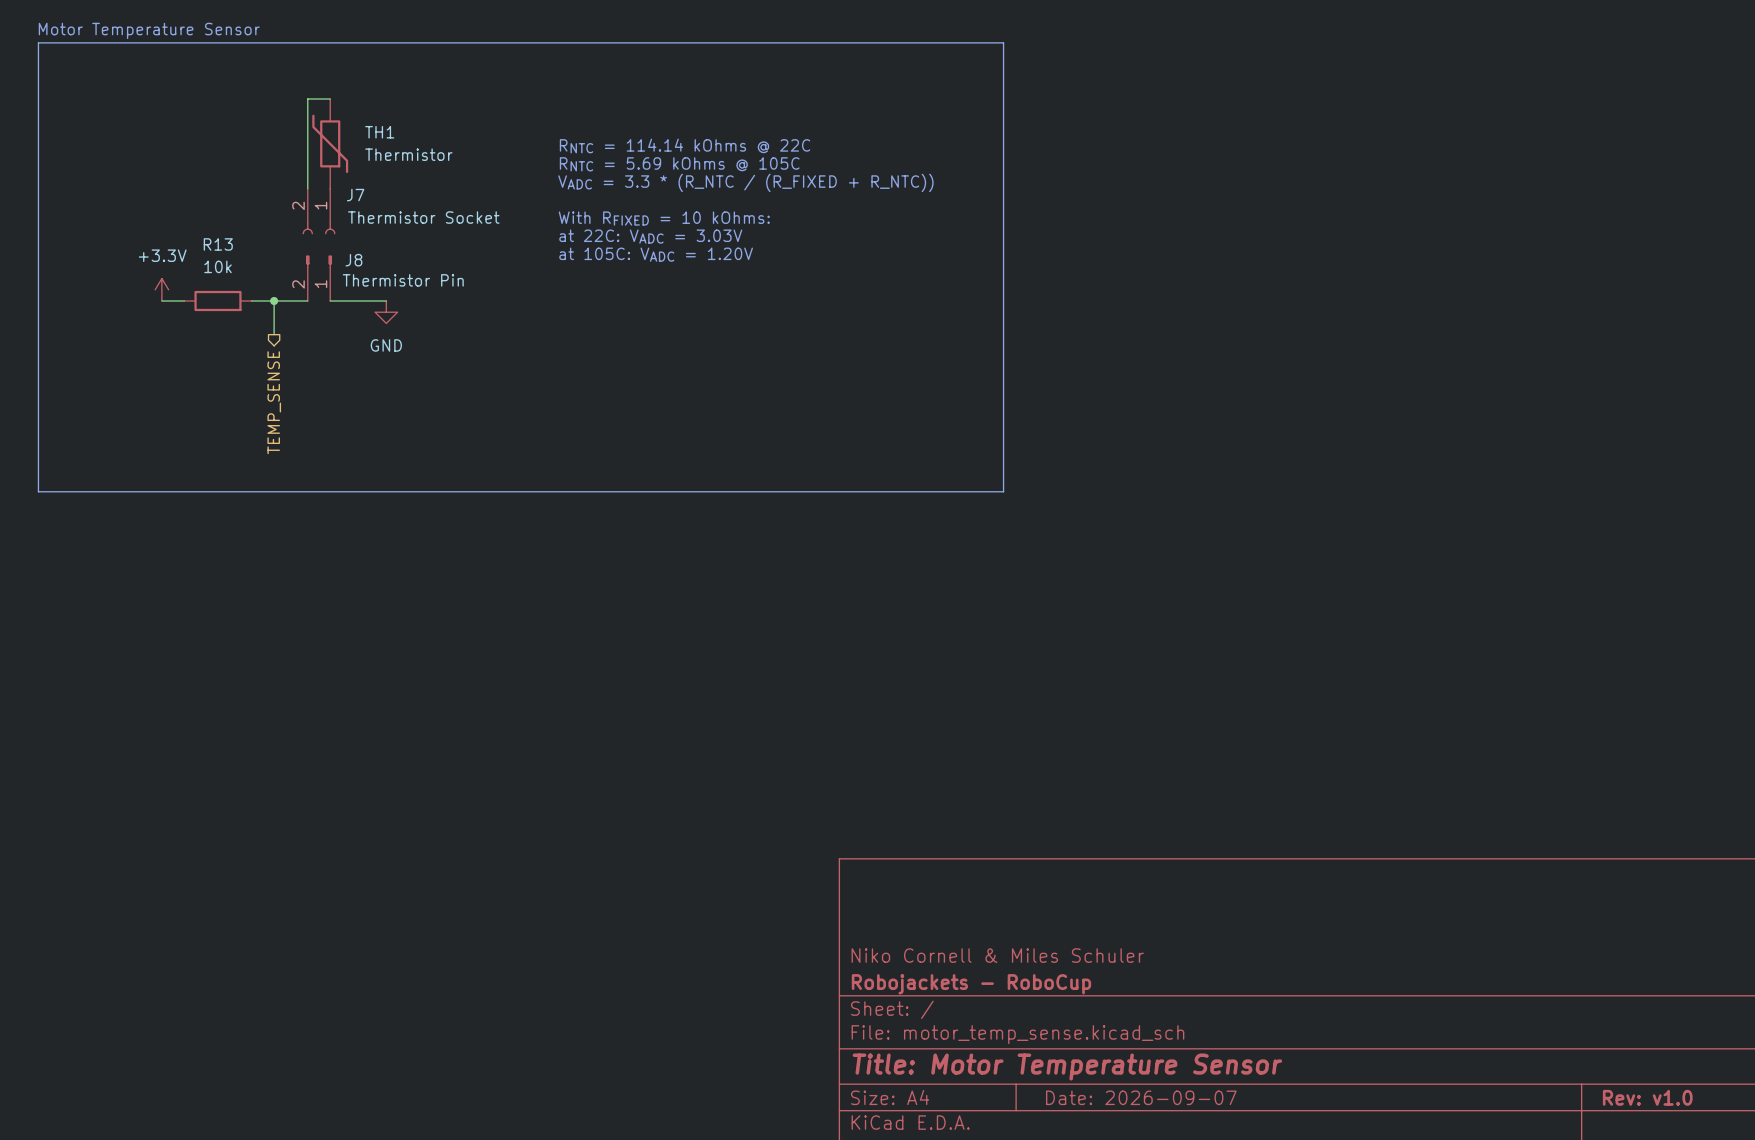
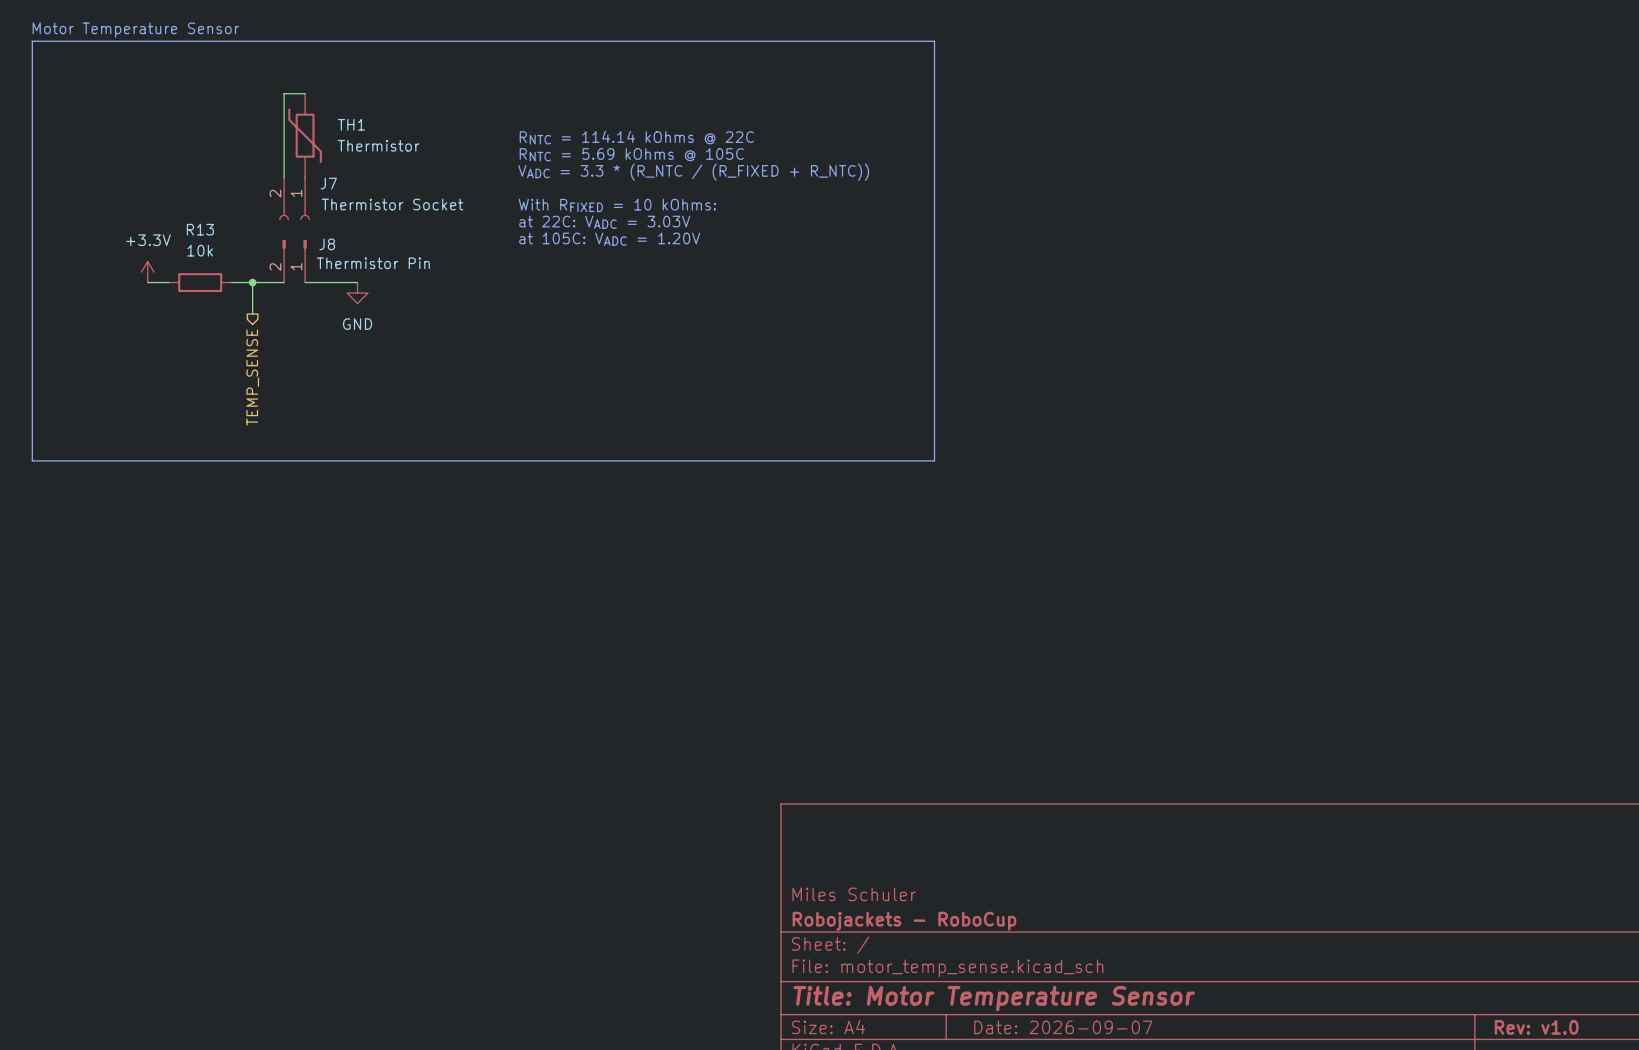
title block: Niko Cornell & Miles Schuler (997, 955) -> Miles Schuler (854, 894)

